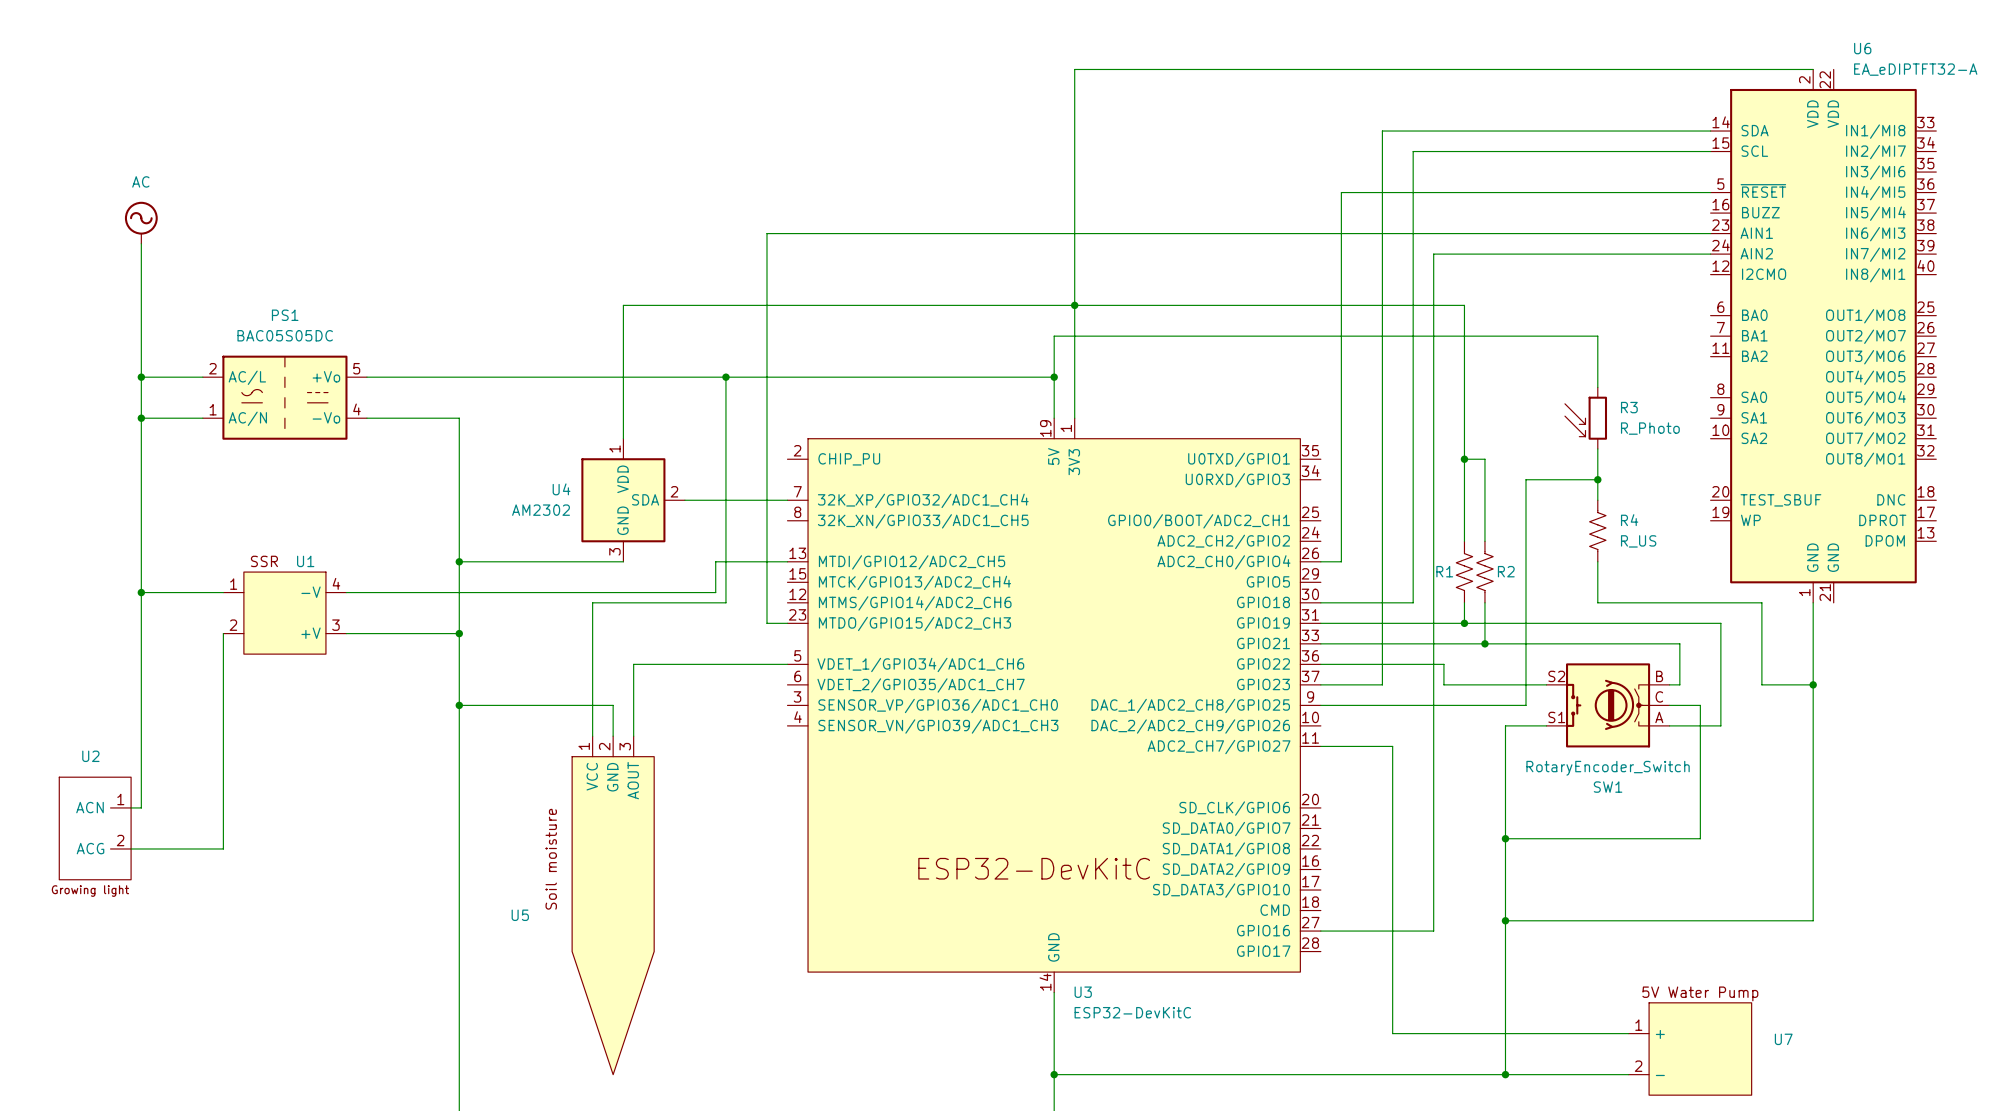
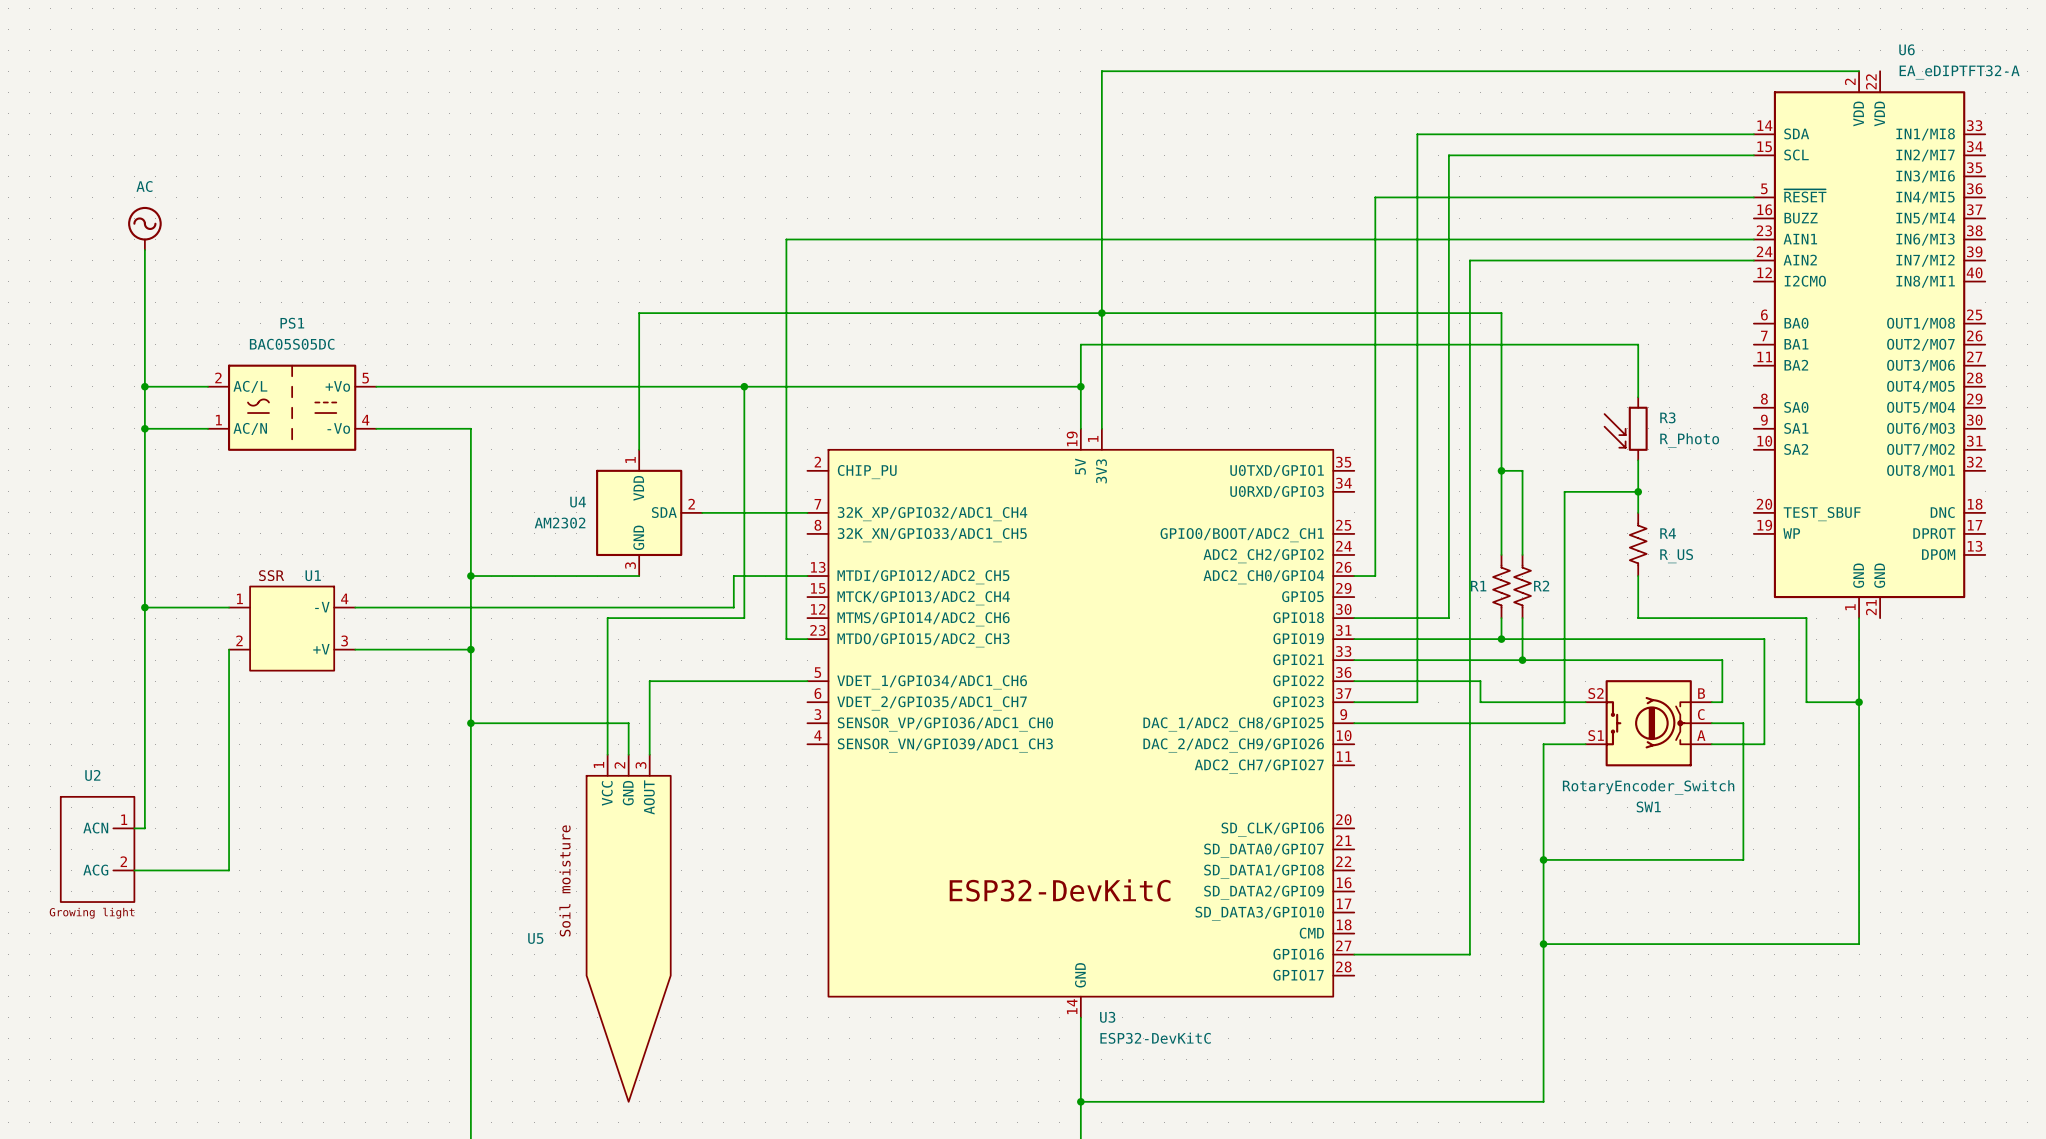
wire: (1320, 746) (1392, 746) (1392, 1033) (1628, 1033) -> none
U7: (1690, 1048) -> none
wire: (1505, 1074) (1628, 1074) -> none
junction: (1505, 1074) -> none

